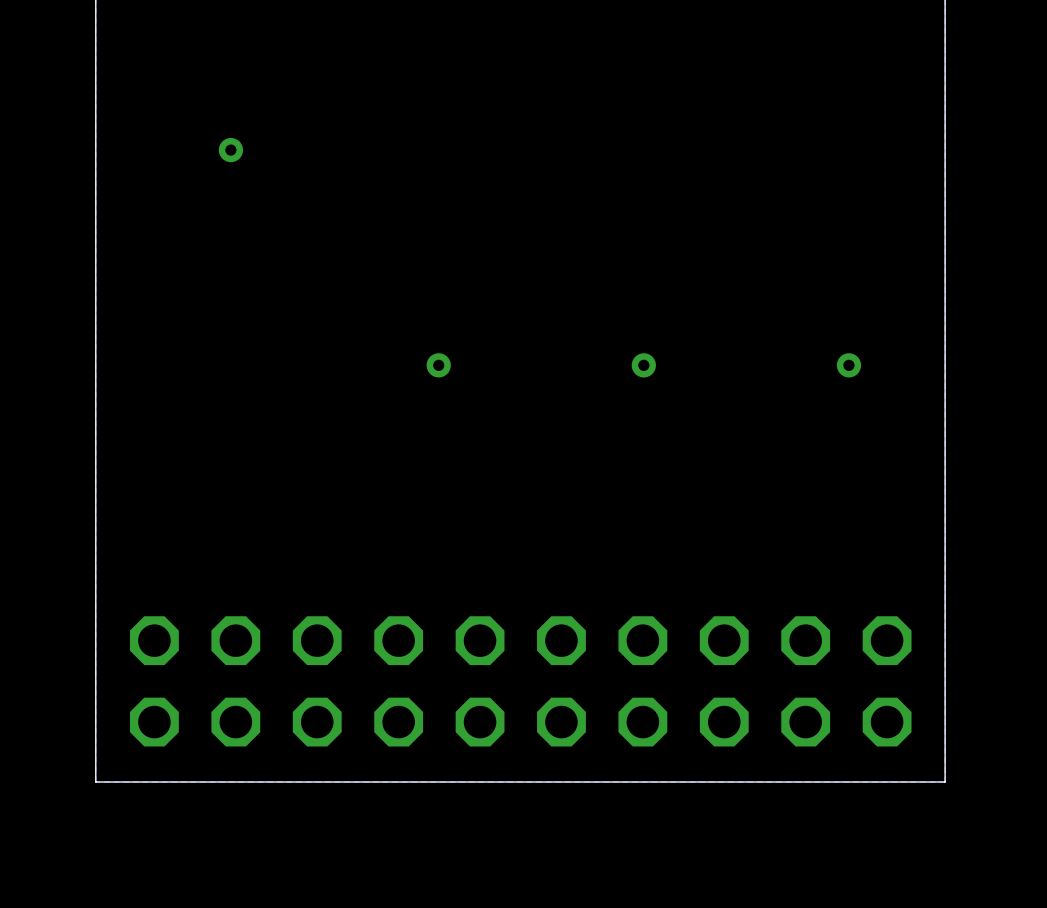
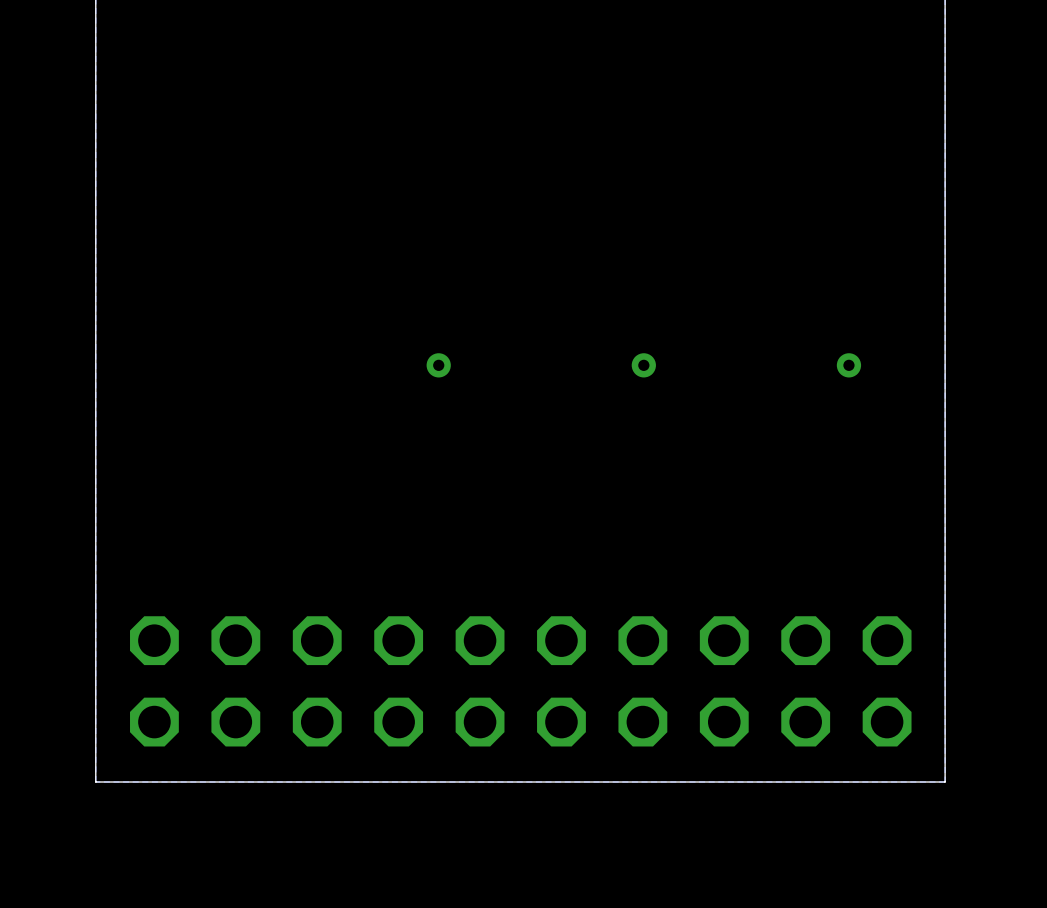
via: (230, 150) -> none

